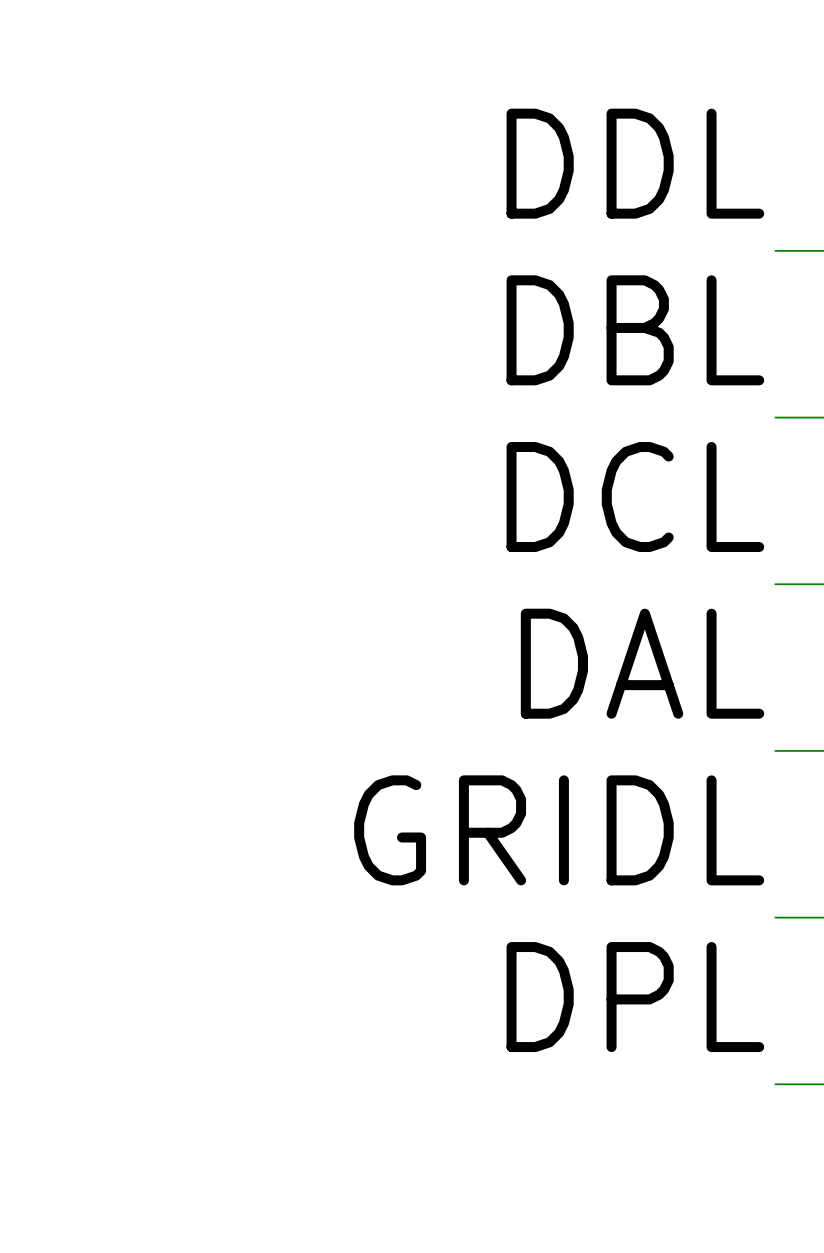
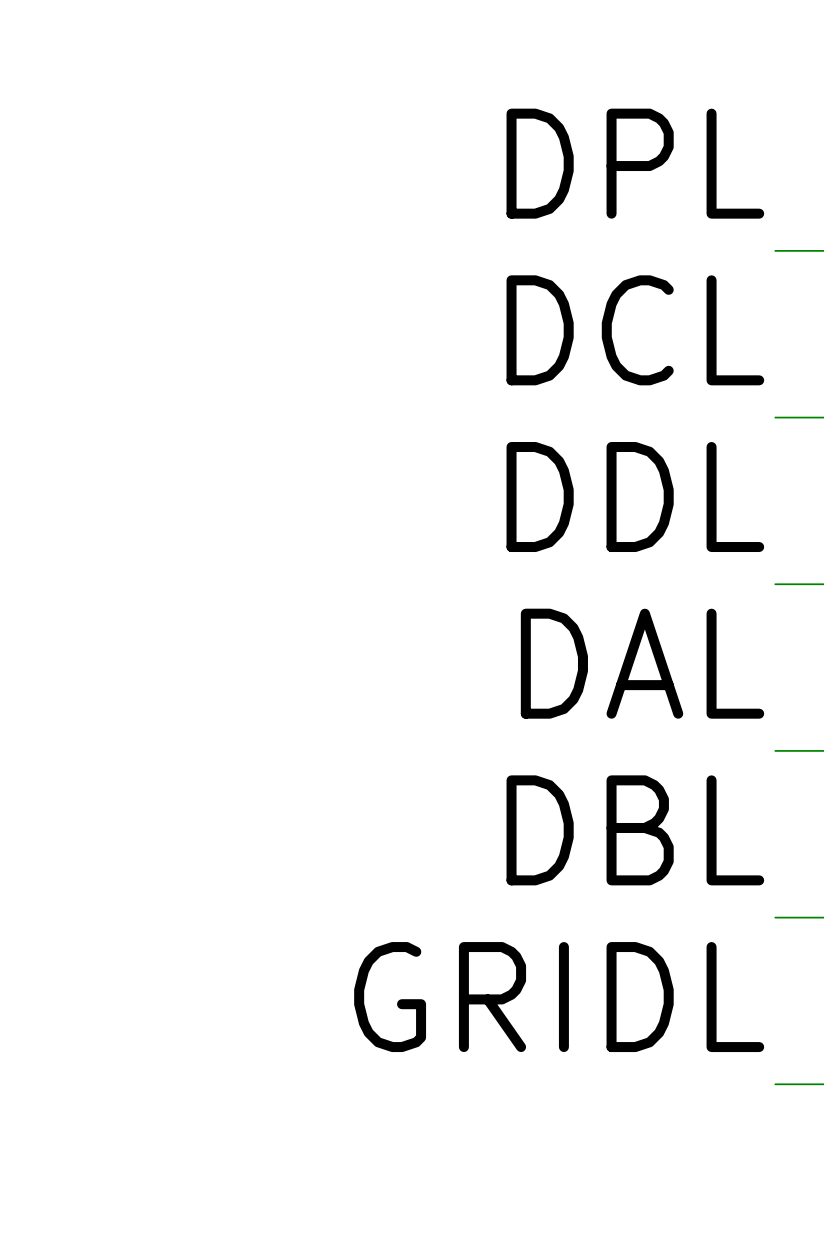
label: DDL (635, 163) -> DPL (635, 163)
label: DBL (635, 330) -> DCL (635, 330)
label: DCL (635, 497) -> DDL (635, 497)
label: GRIDL (559, 830) -> DBL (635, 830)
label: DPL (635, 997) -> GRIDL (559, 997)

